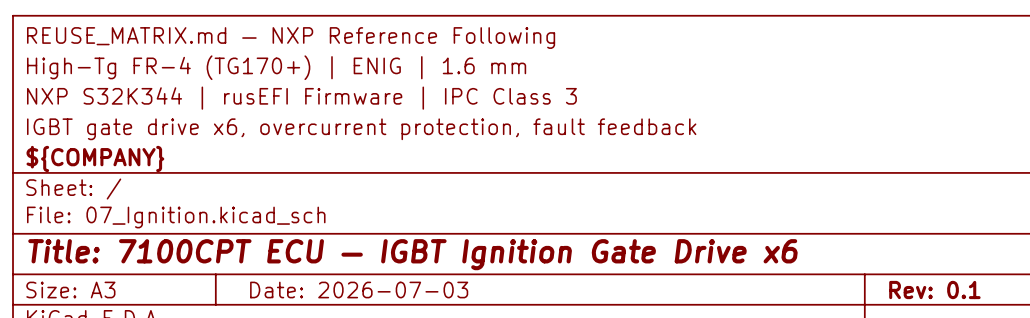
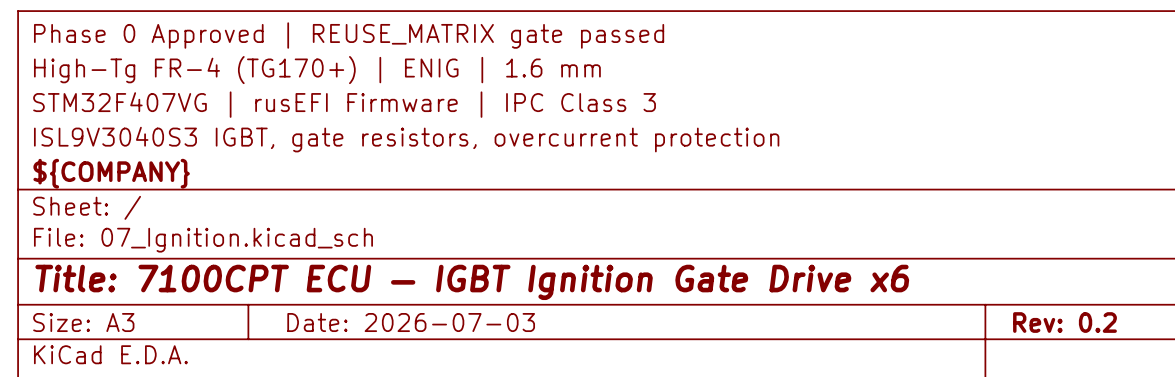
title block: REUSE_MATRIX.md — NXP Reference Following (291, 38) -> Phase 0 Approved | REUSE_MATRIX gate passed (349, 35)
title block: NXP S32K344 | rusEFI Firmware | IPC Class 3 (301, 98) -> STM32F407VG | rusEFI Firmware | IPC Class 3 (344, 104)
title block: IGBT gate drive x6, overcurrent protection, fault feedback (361, 129) -> ISL9V3040S3 IGBT, gate resistors, overcurrent protection (406, 139)
title block: Rev: 0.1 (934, 290) -> Rev: 0.2 (1064, 322)

